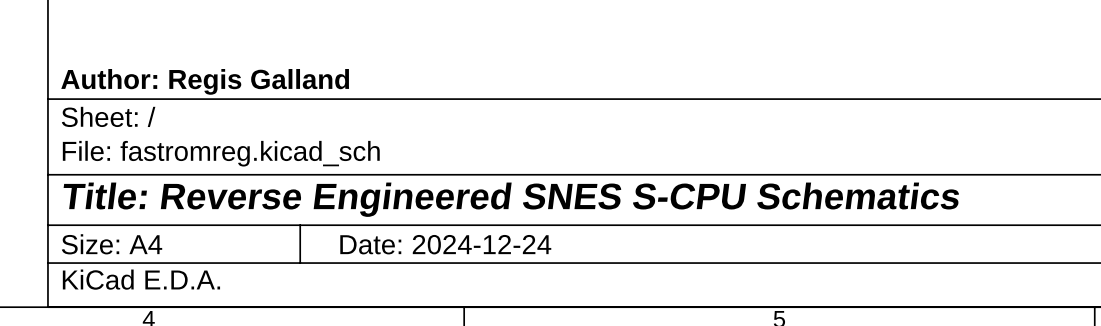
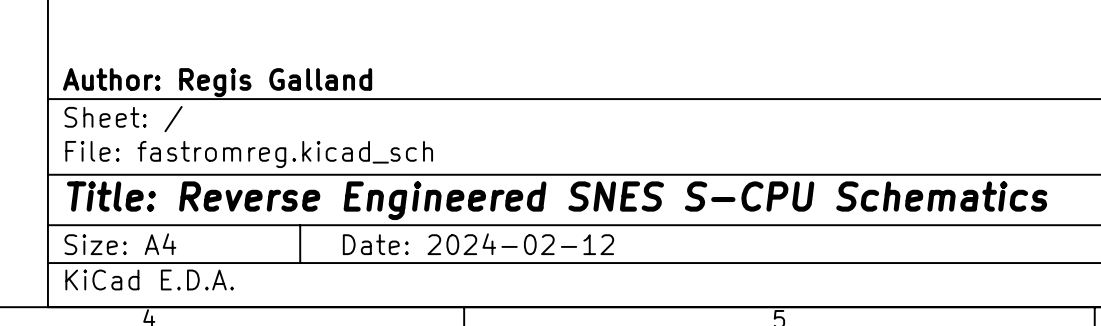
title block: Date: 2024-12-24 (445, 244) -> Date: 2024-02-12 (478, 244)

